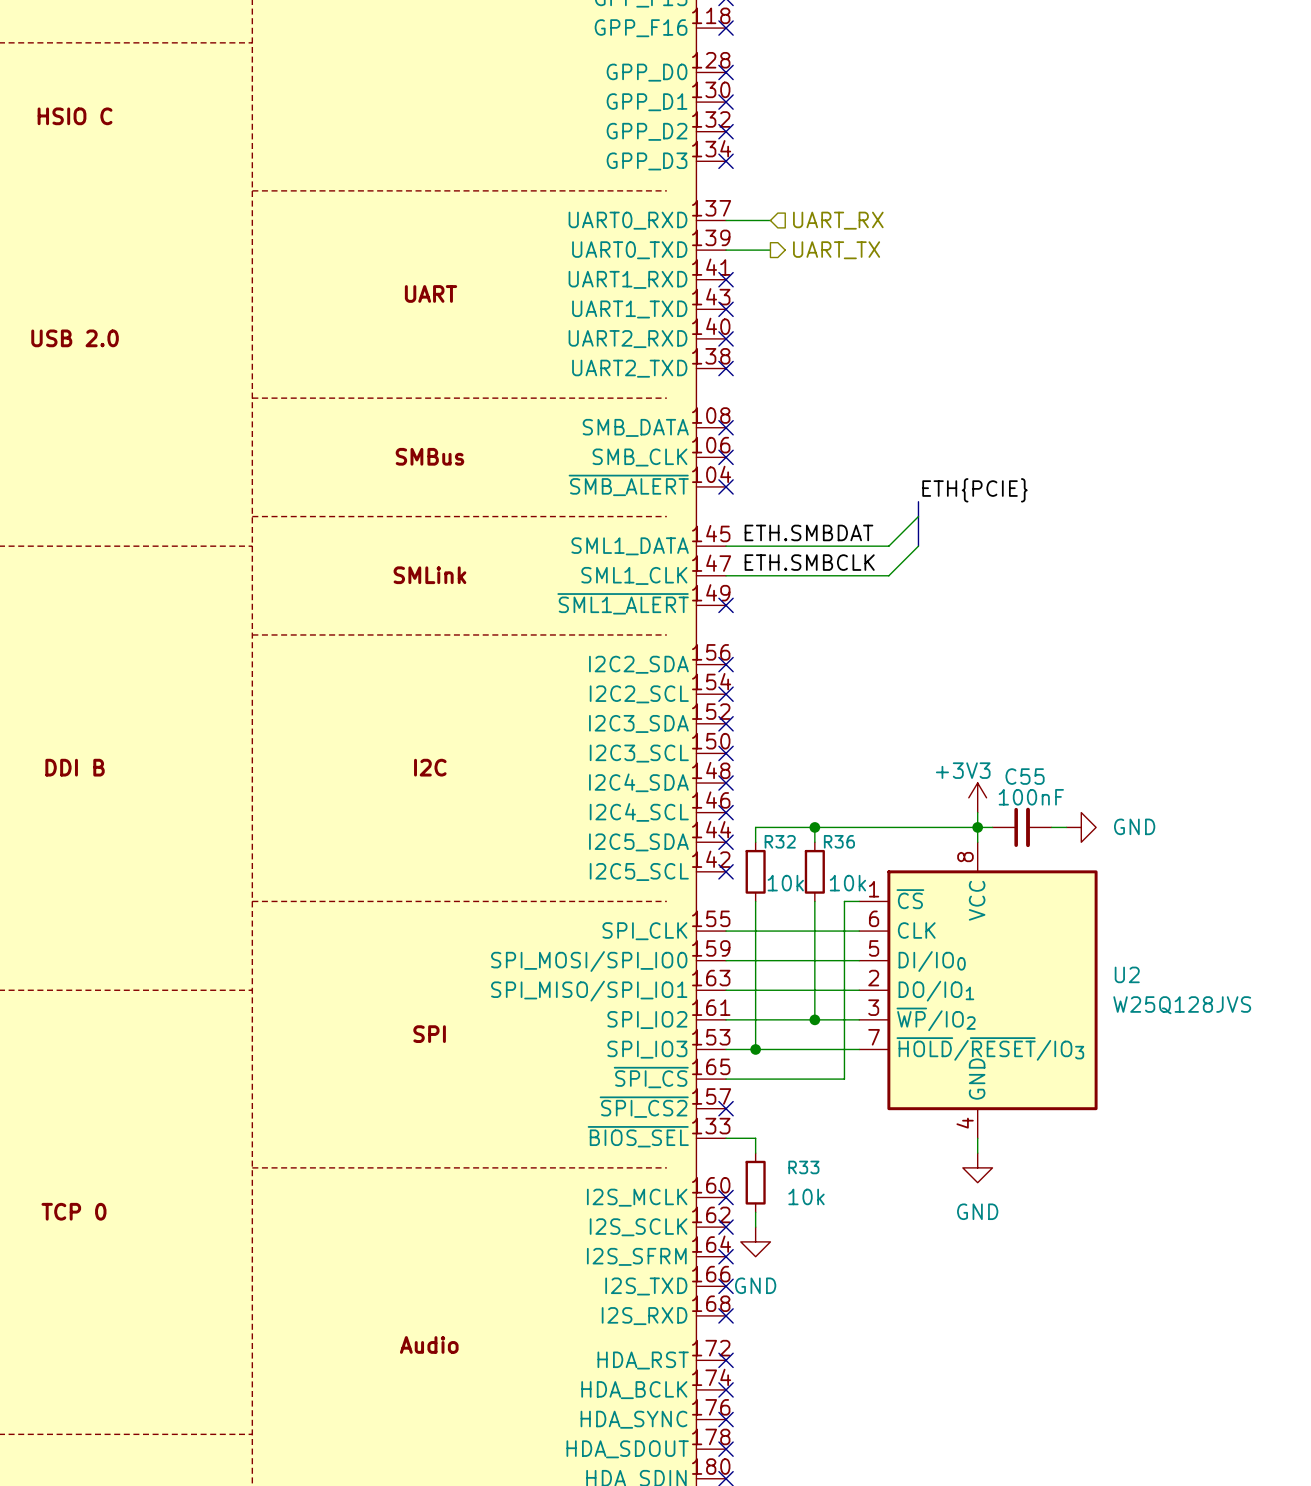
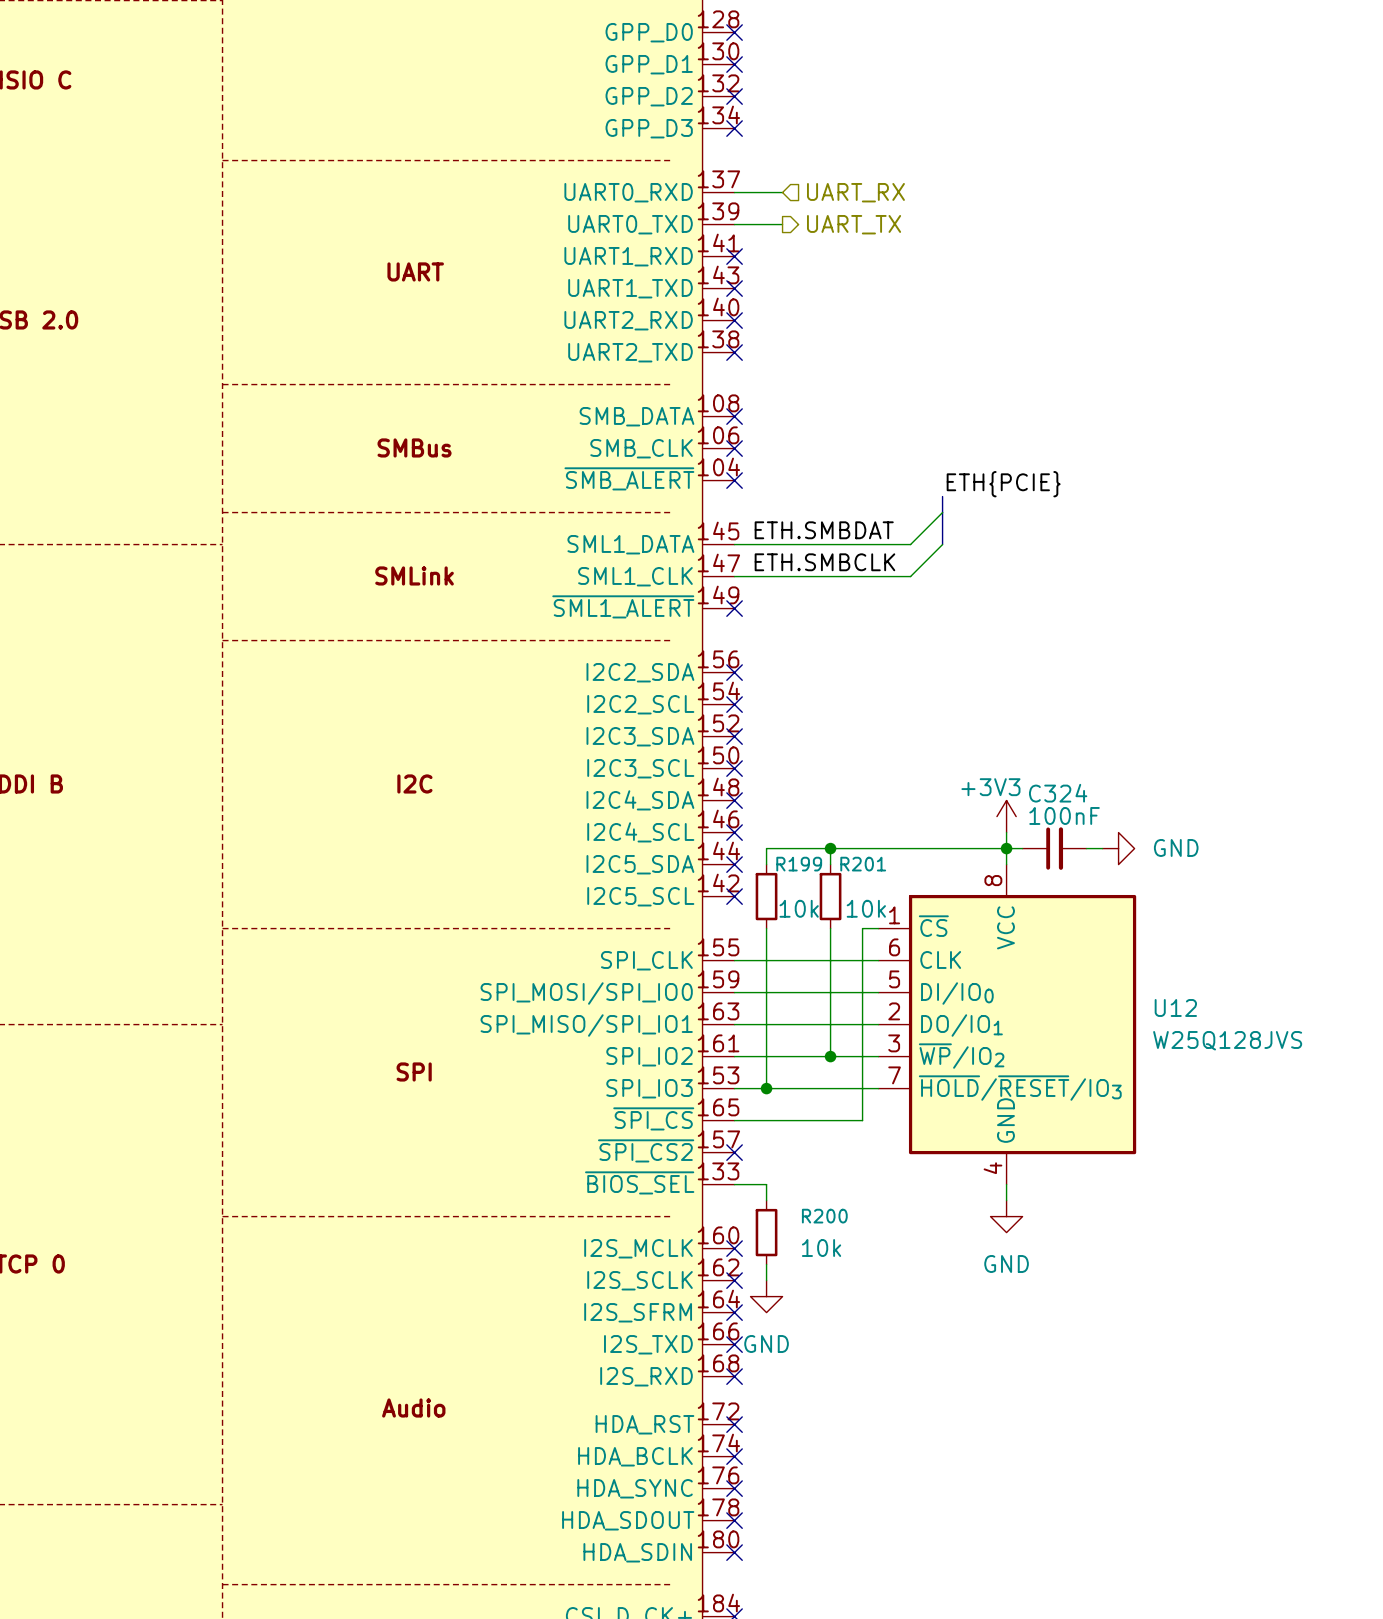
C55 name: C55 (1025, 776) -> C324 (1058, 793)
R32 name: R32 (780, 841) -> R199 (799, 864)
R36 name: R36 (839, 841) -> R201 (863, 864)
U2 name: U2 (1127, 974) -> U12 (1175, 1007)
R33 name: R33 (803, 1167) -> R200 (824, 1216)

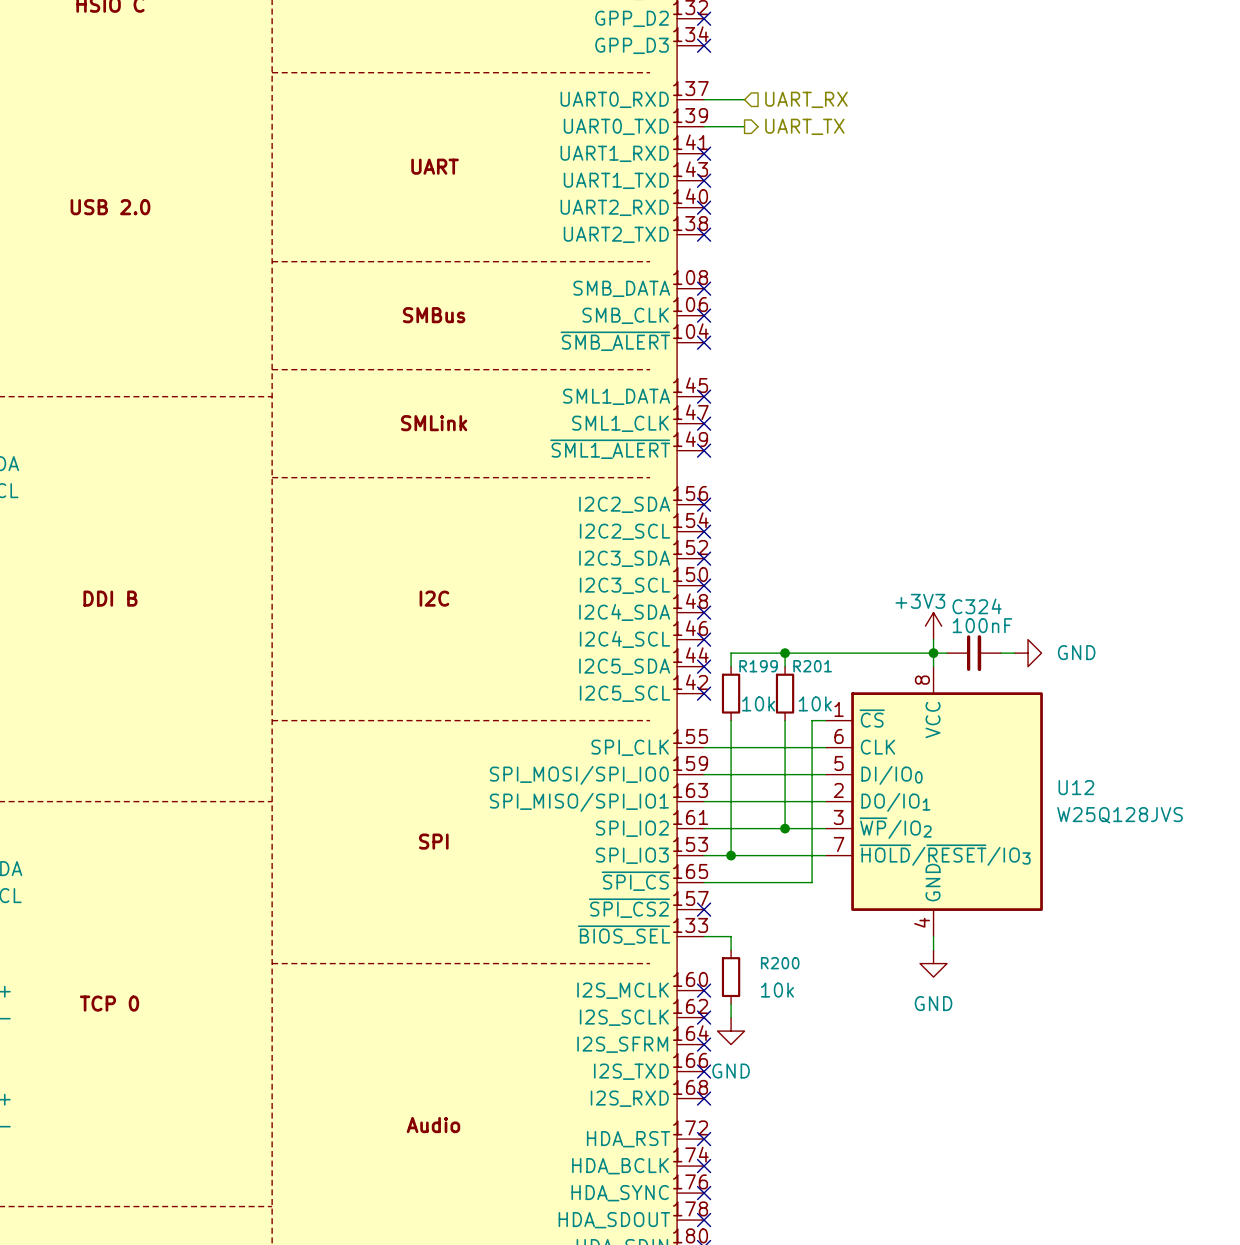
label: ETH{PCIE} (1003, 484) -> none
bus: (942, 496) (942, 544) -> none
wire: (942, 512) (910, 544) (734, 544) -> none
label: ETH.SMBDAT (824, 530) -> none
no-connect mark: none -> (704, 396)
wire: (942, 544) (910, 576) (734, 576) -> none
label: ETH.SMBCLK (824, 562) -> none
no-connect mark: none -> (704, 423)

